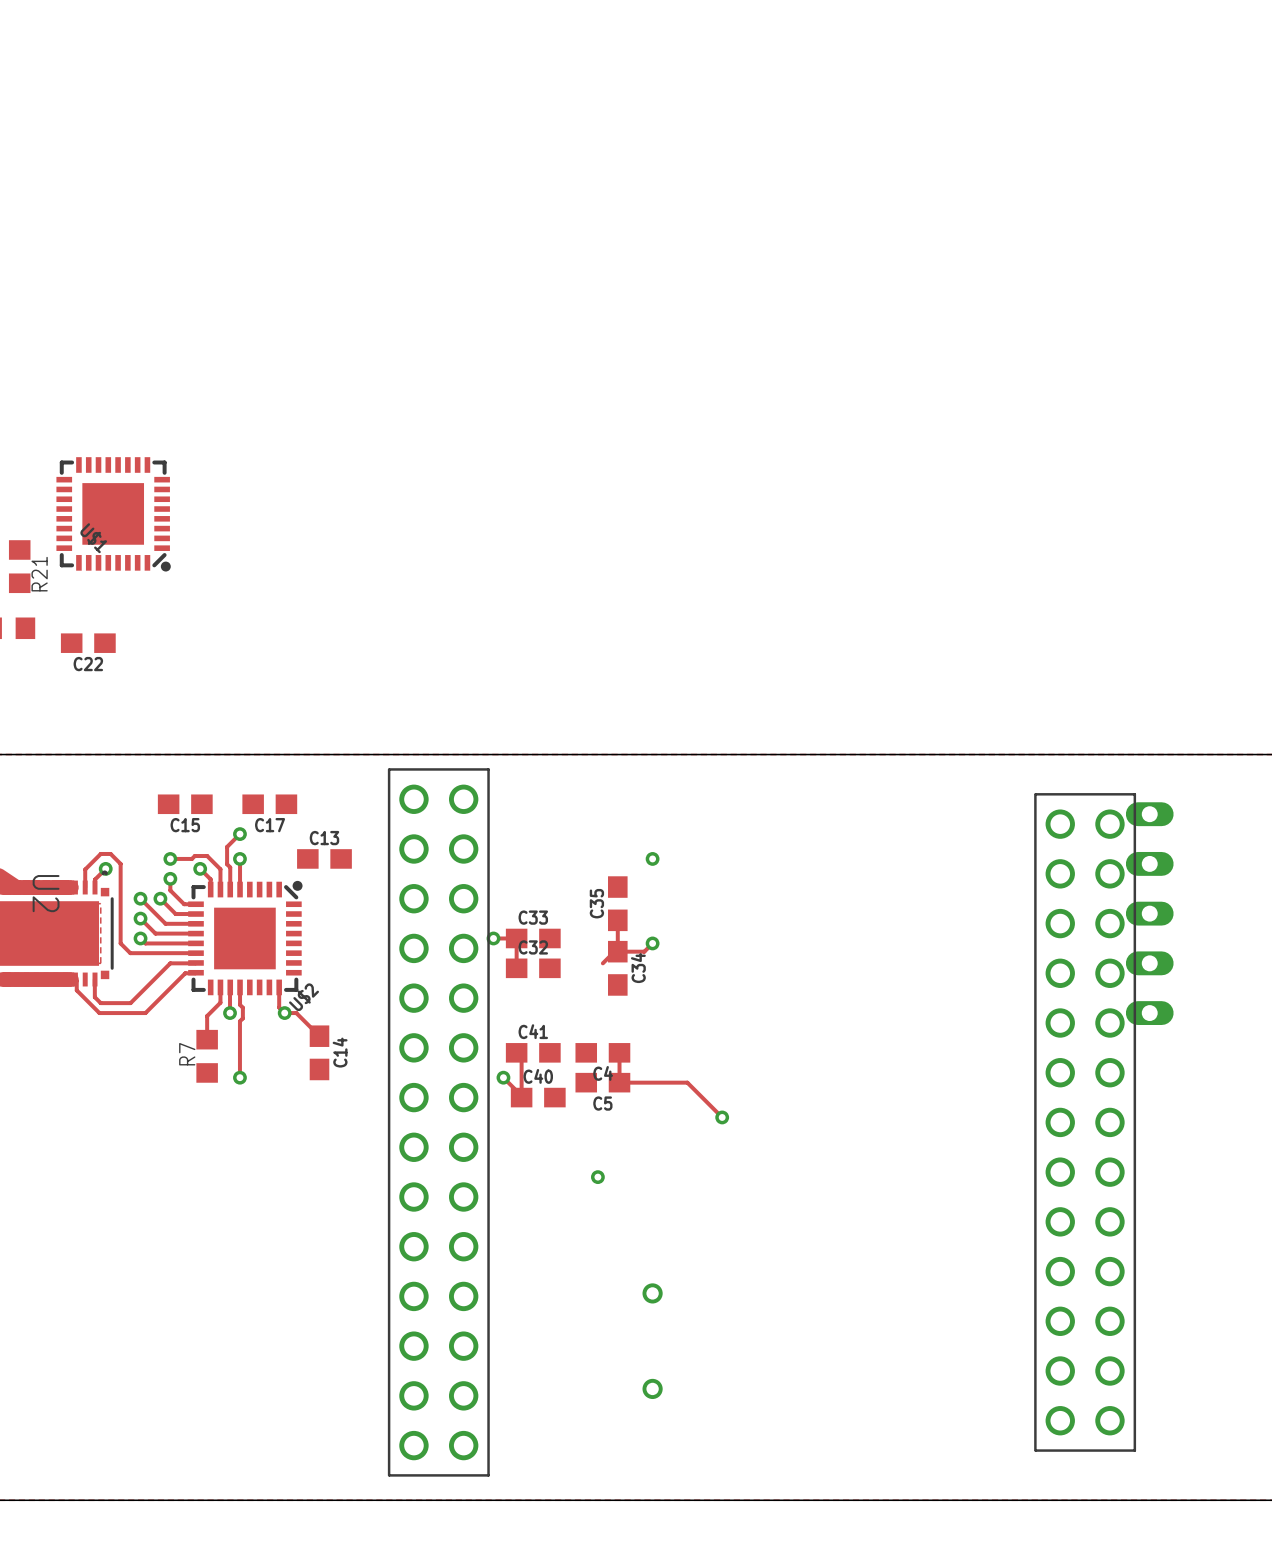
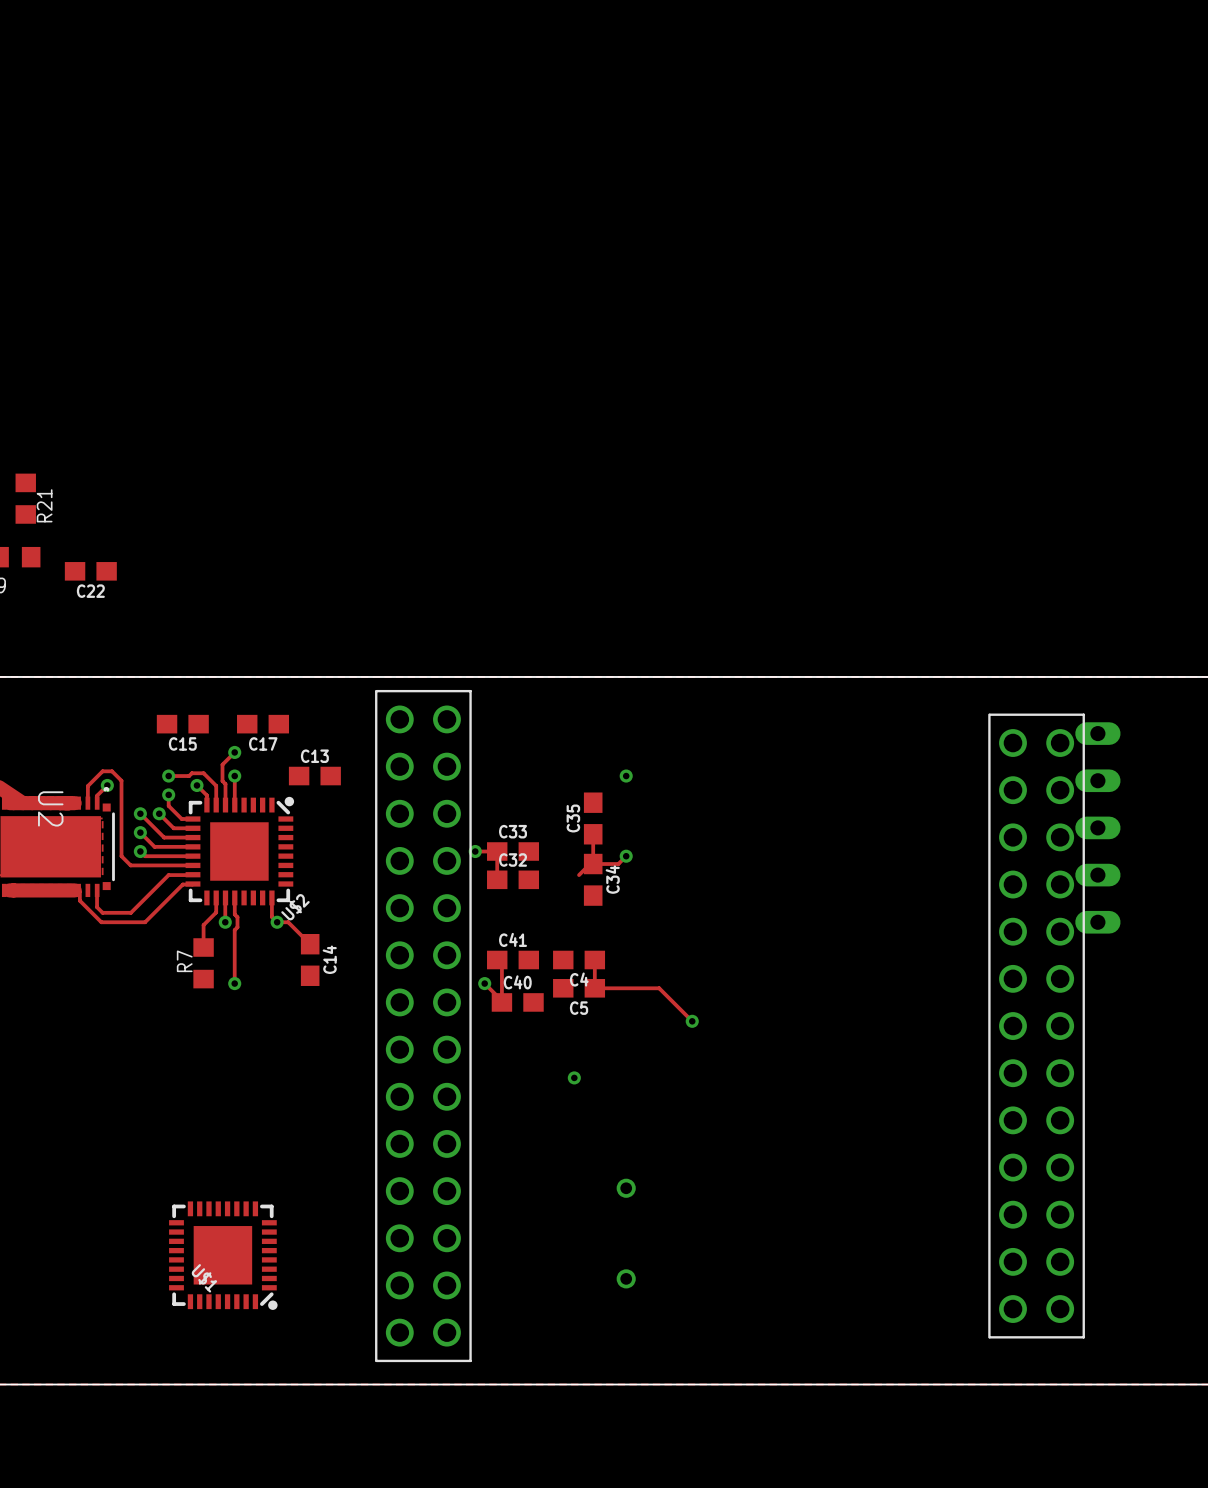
U$1 position: (113, 514) -> (223, 1255)

